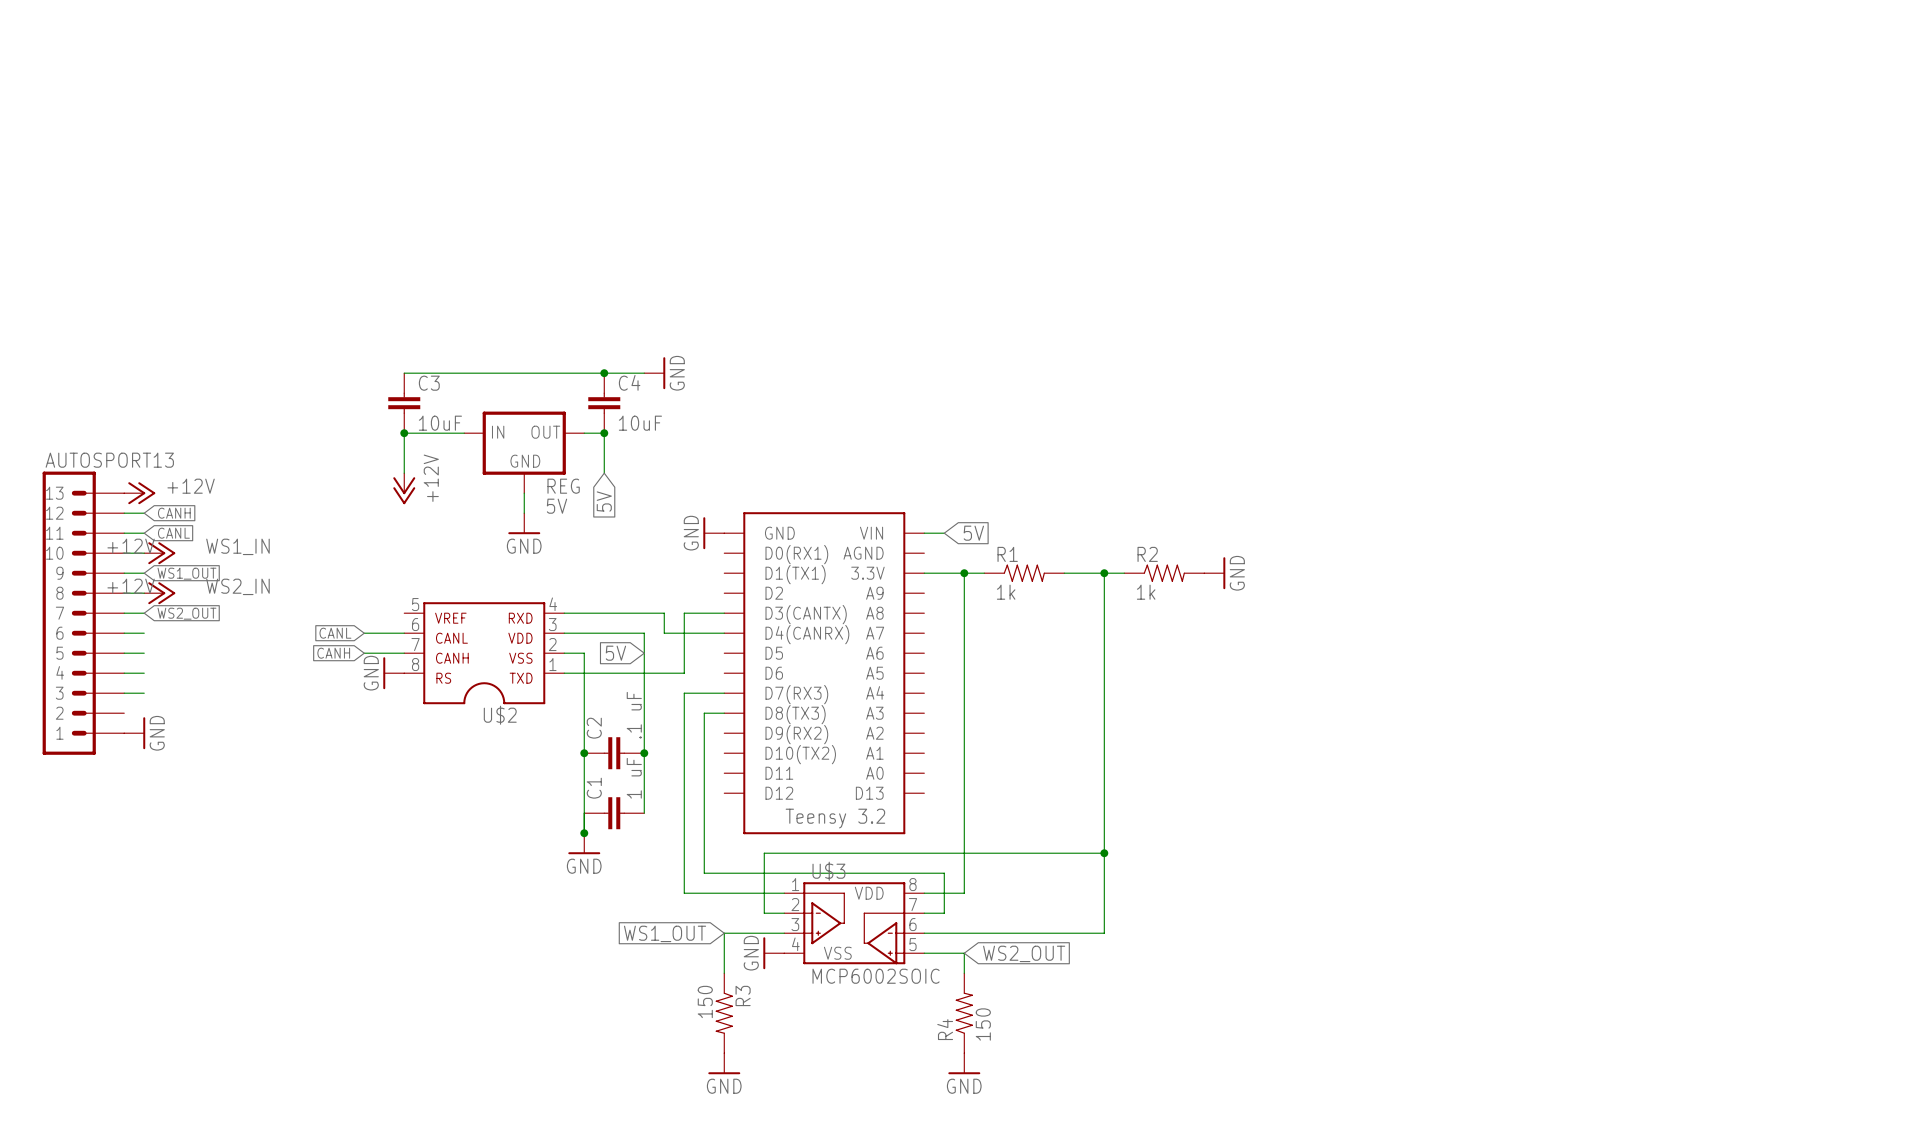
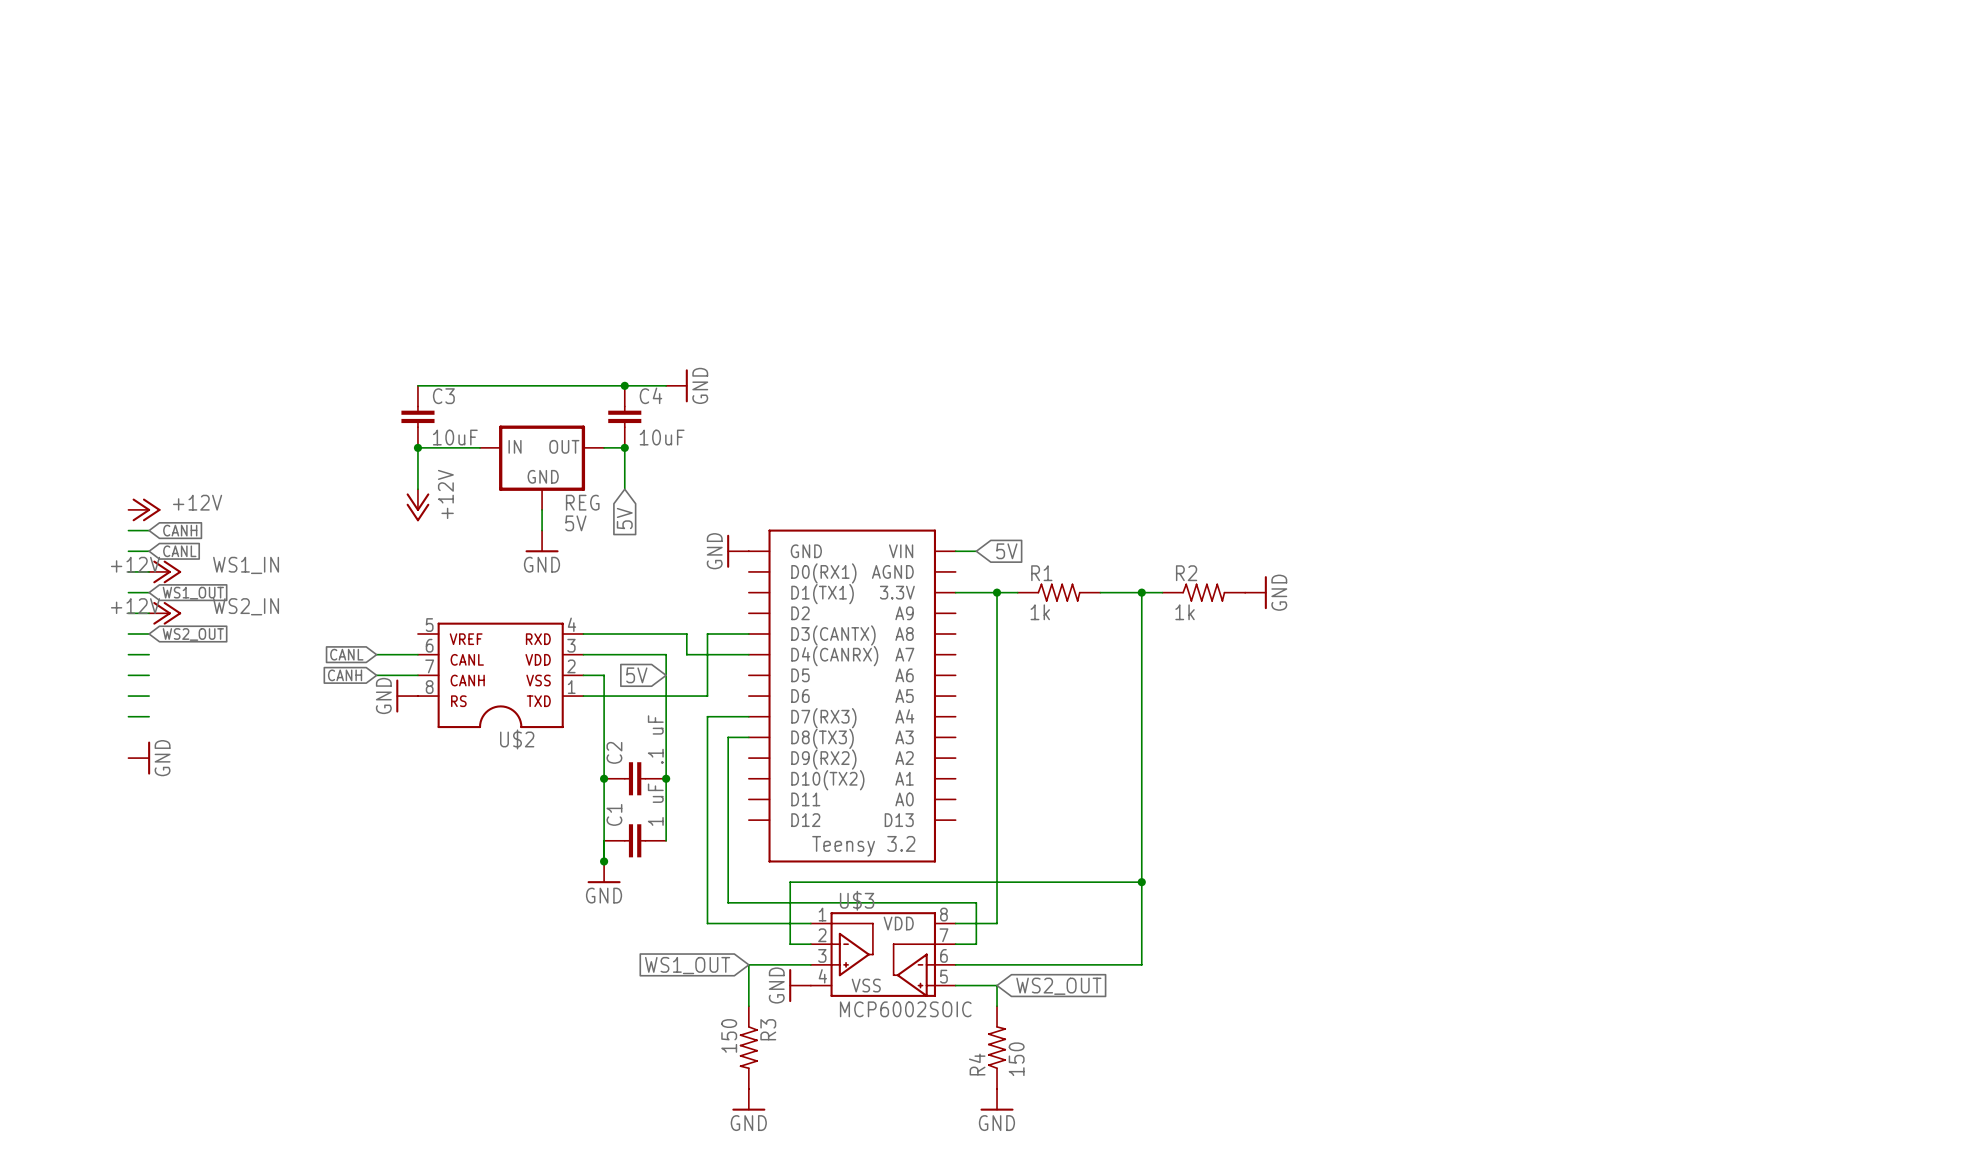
AUTOSPORT13: (83, 613) -> none

